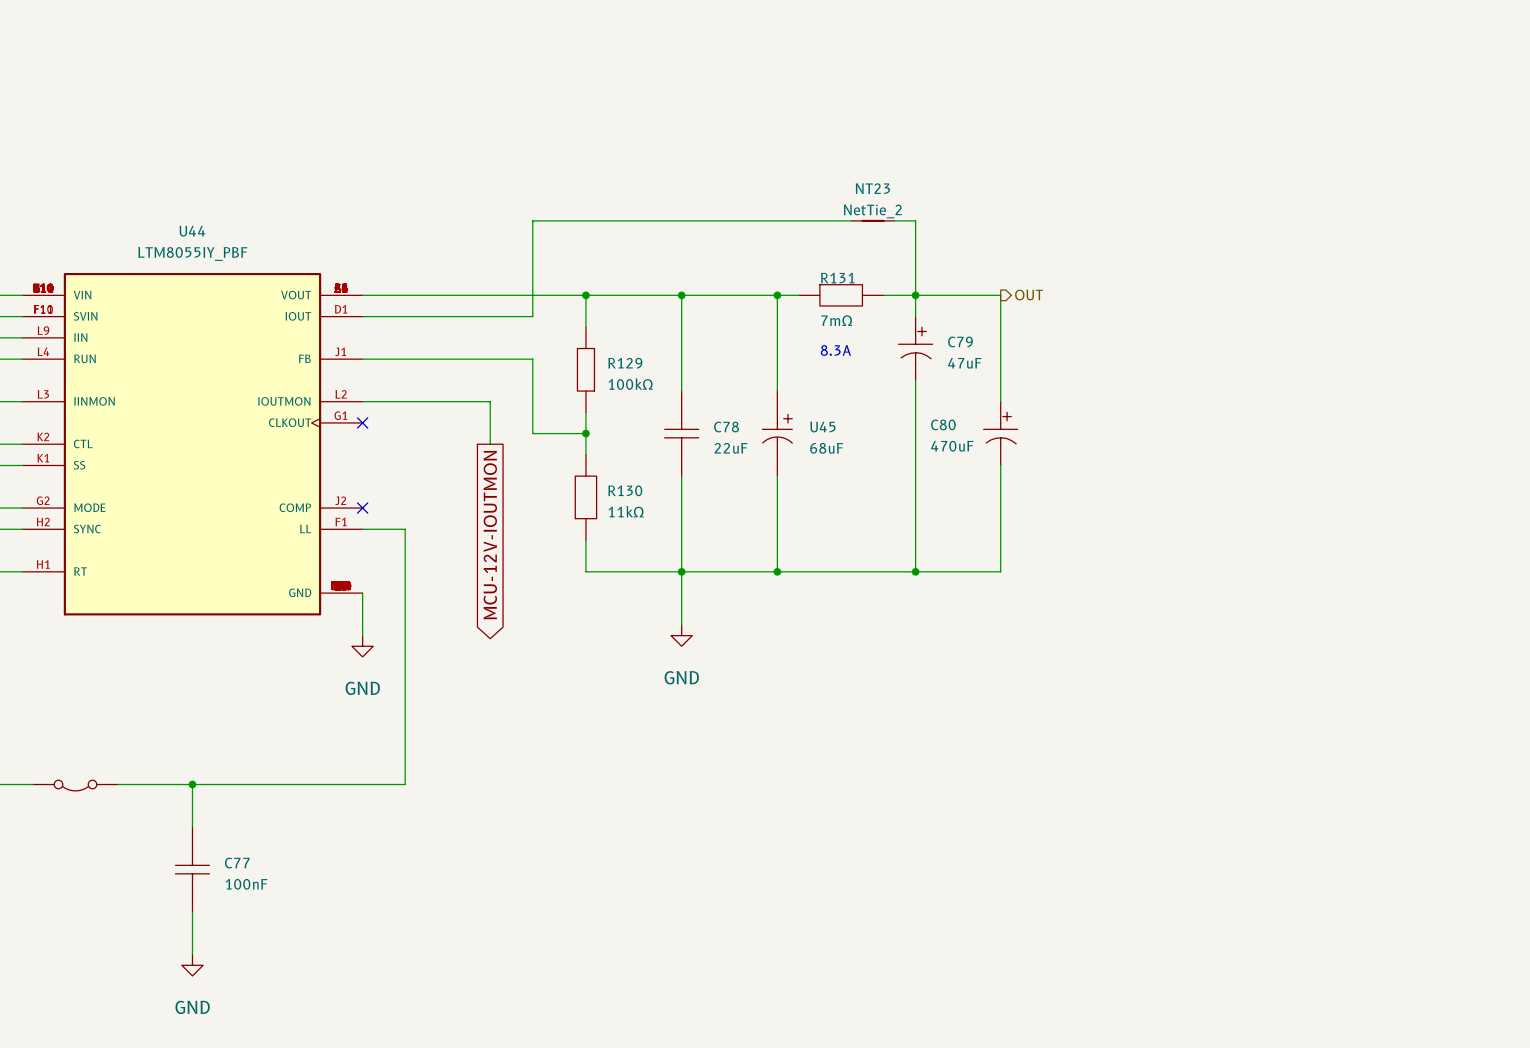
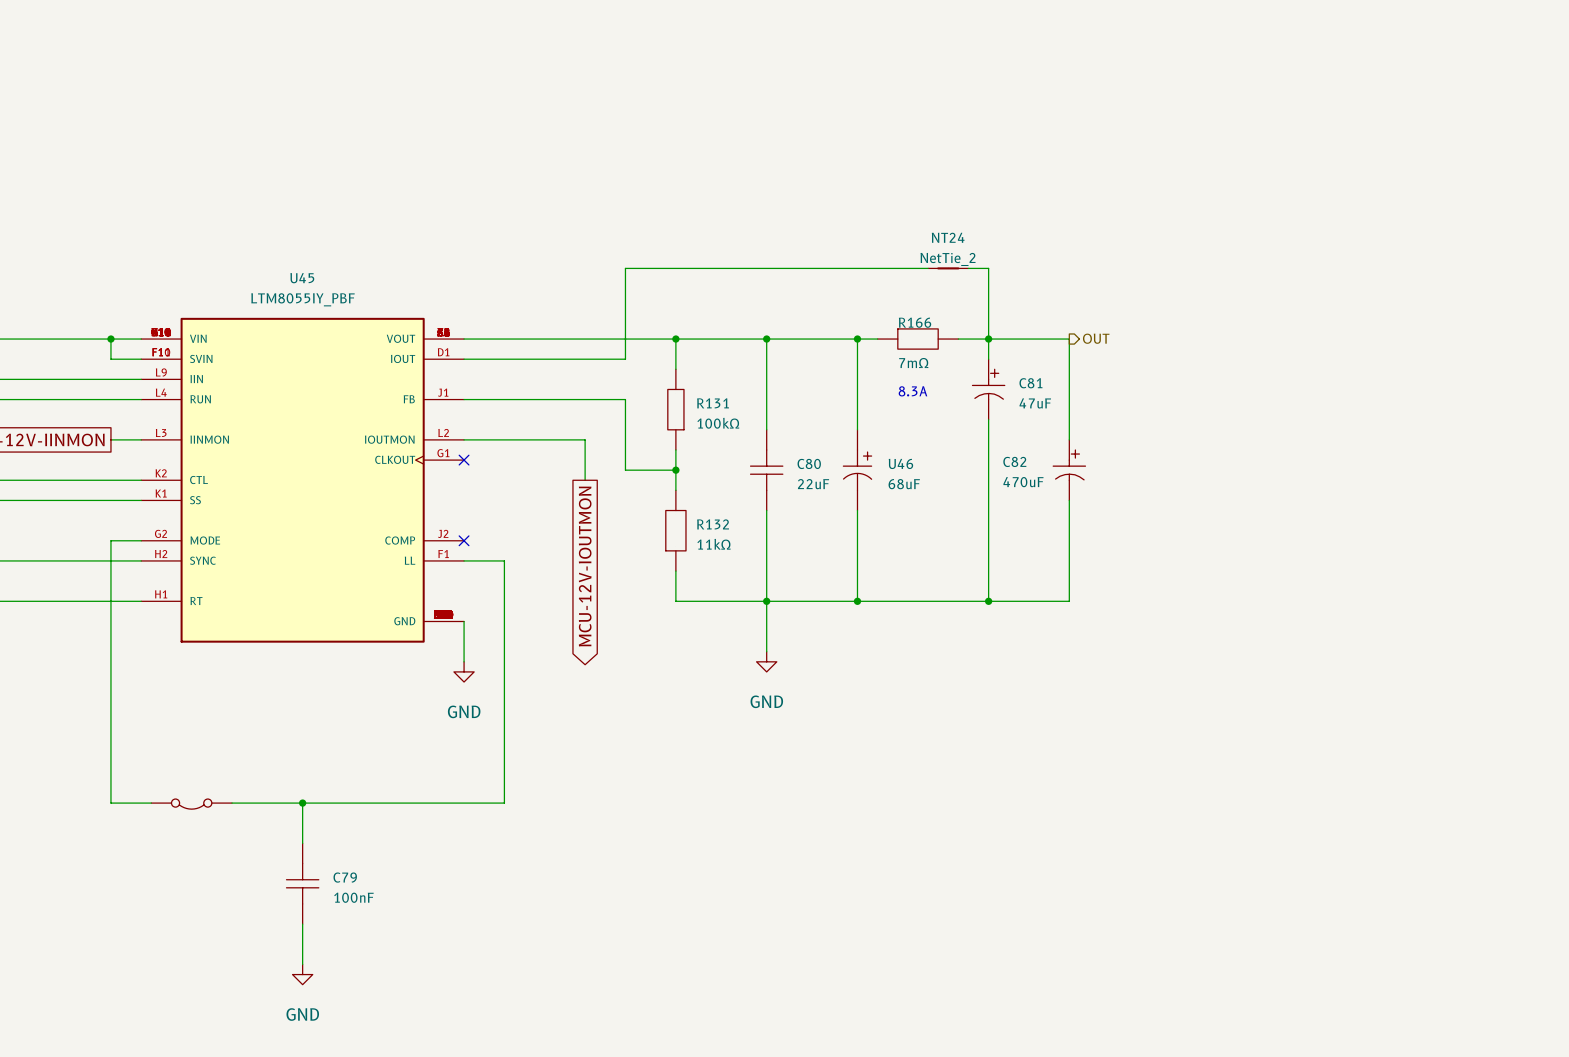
NT23 name: NT23 (872, 188) -> NT24 (948, 237)
U44 name: U44 (192, 231) -> U45 (302, 278)
R131 name: R131 (837, 278) -> R166 (915, 322)
C79 name: C79 (960, 341) -> C81 (1030, 383)
R129 name: R129 (625, 363) -> R131 (713, 403)
C80 name: C80 (943, 424) -> C82 (1014, 461)
C78 name: C78 (726, 427) -> C80 (809, 463)
U45 name: U45 (822, 427) -> U46 (900, 463)
R130 name: R130 (625, 490) -> R132 (713, 524)
C77 name: C77 (237, 863) -> C79 (345, 877)

